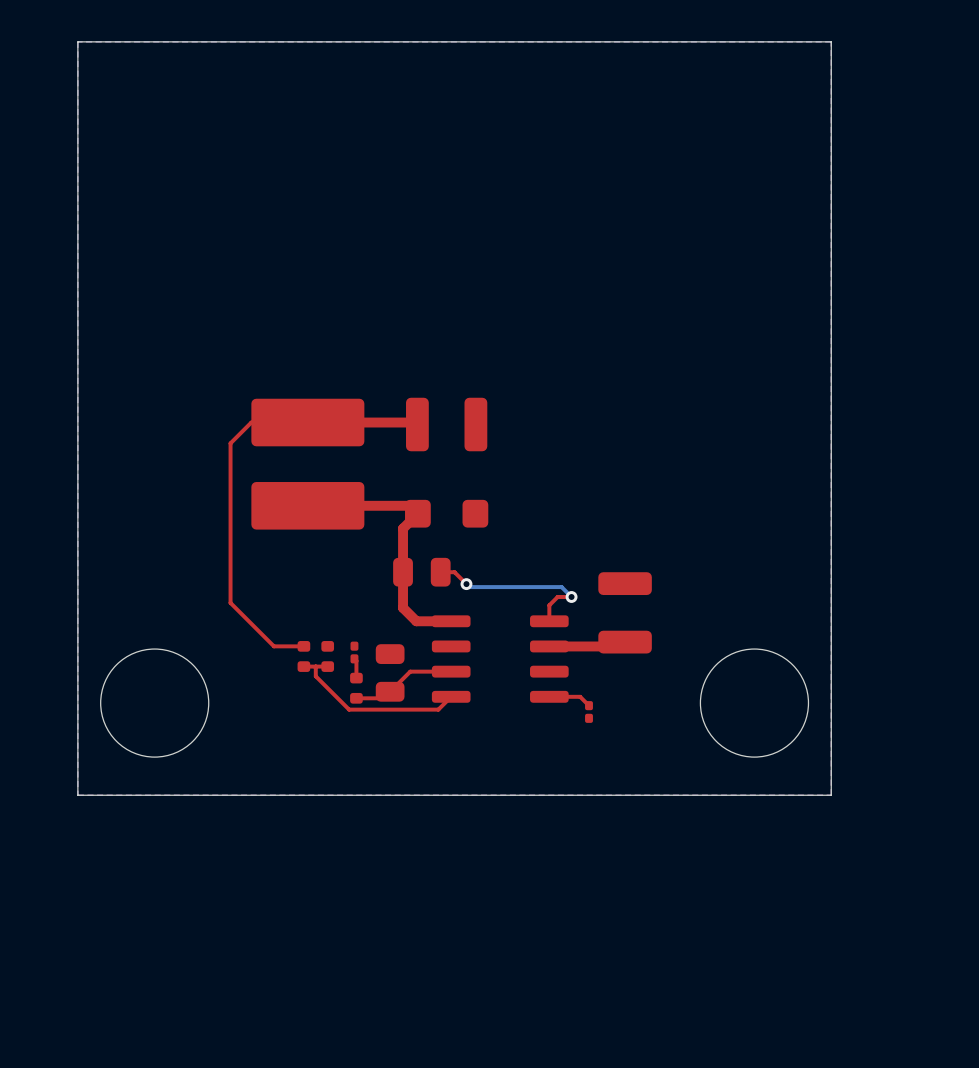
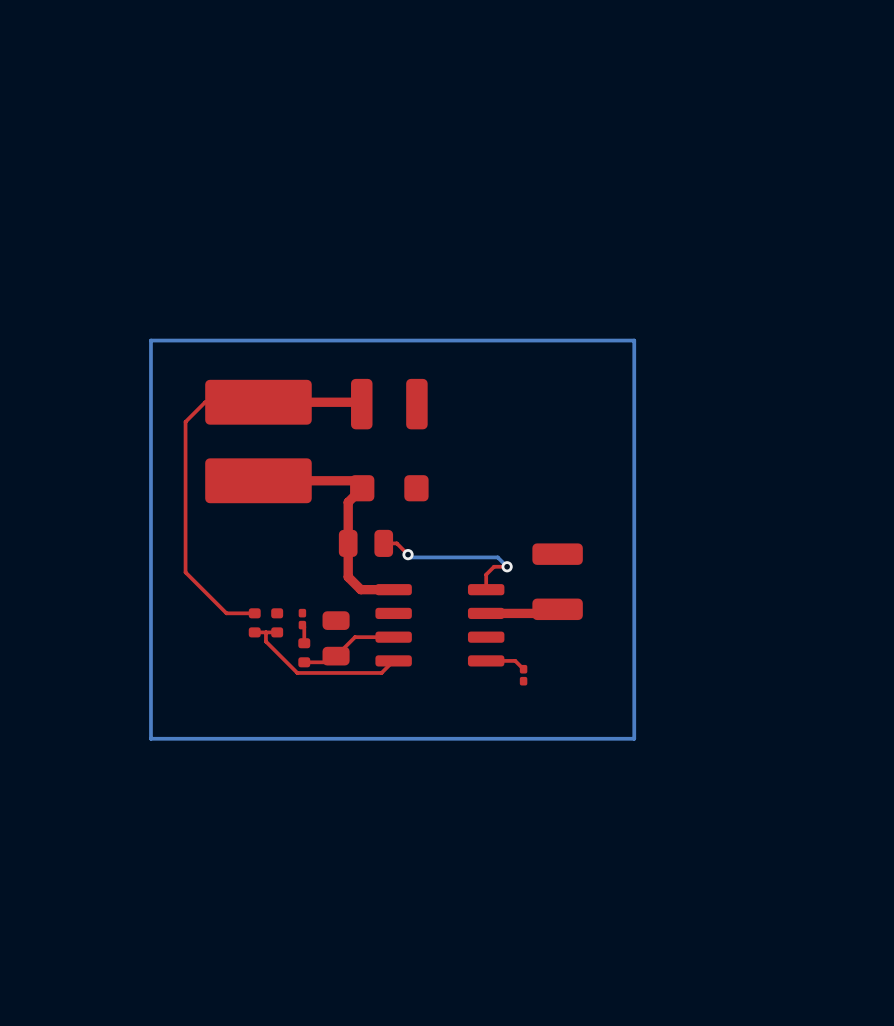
board edge: (831, 41) (77, 41) (77, 795) (831, 795) (831, 41) -> none
bottom track: none -> (634, 340) (150, 340) (150, 738) (634, 738) (634, 340)
round board edge: [100, 648, 210, 758] -> none
round board edge: [699, 648, 809, 758] -> none

